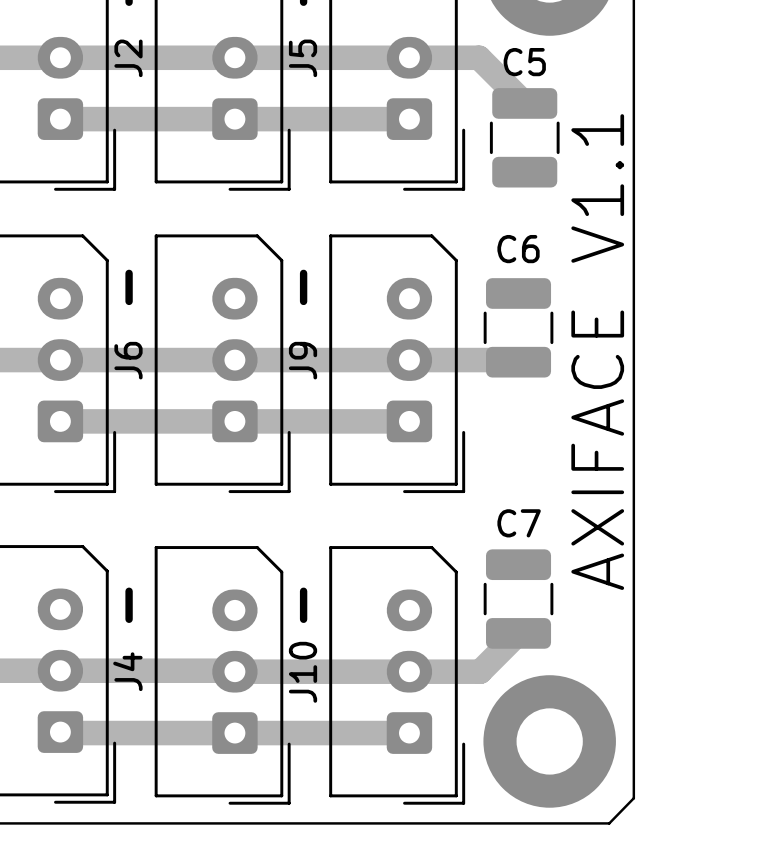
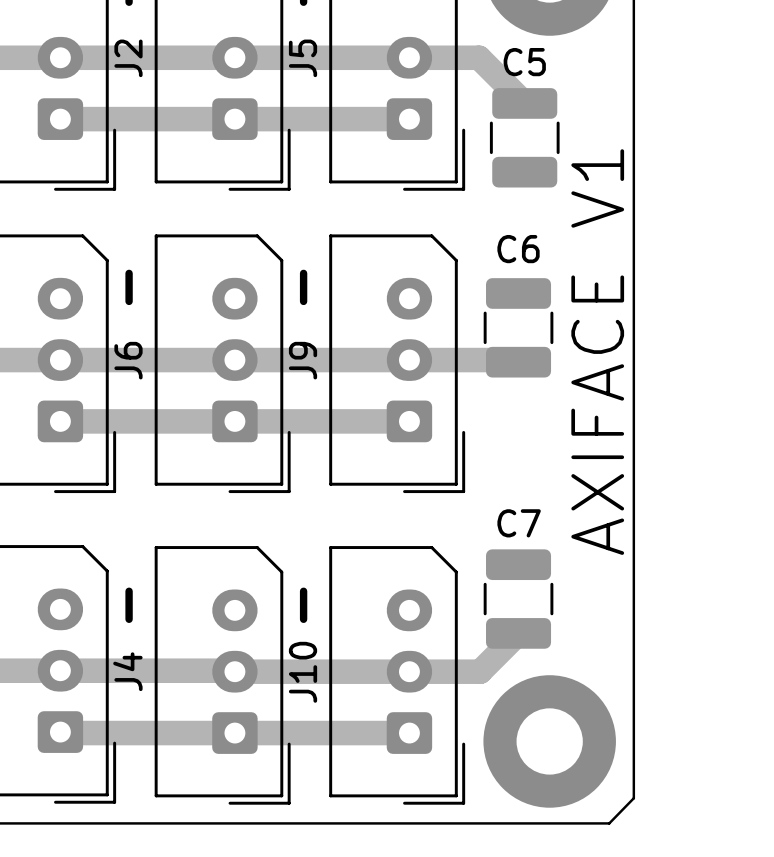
text: AXIFACE V1.1 (597, 352) -> AXIFACE V1 (597, 352)

